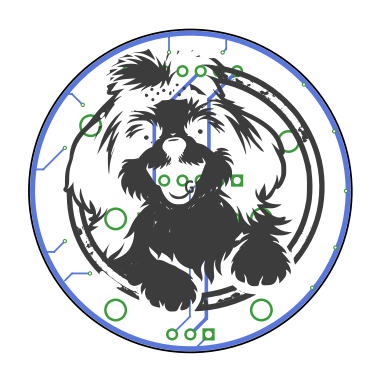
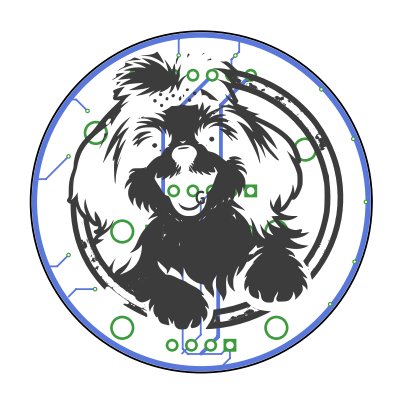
track: none -> (235, 55) (231, 59) (231, 75)
track: none -> (170, 231) (182, 242) (182, 348) (187, 353) (221, 353) (229, 345) (229, 358) (223, 364)
part: none -> (201, 345)
part: (190, 334) -> none
track: (208, 334) (197, 346) -> none

